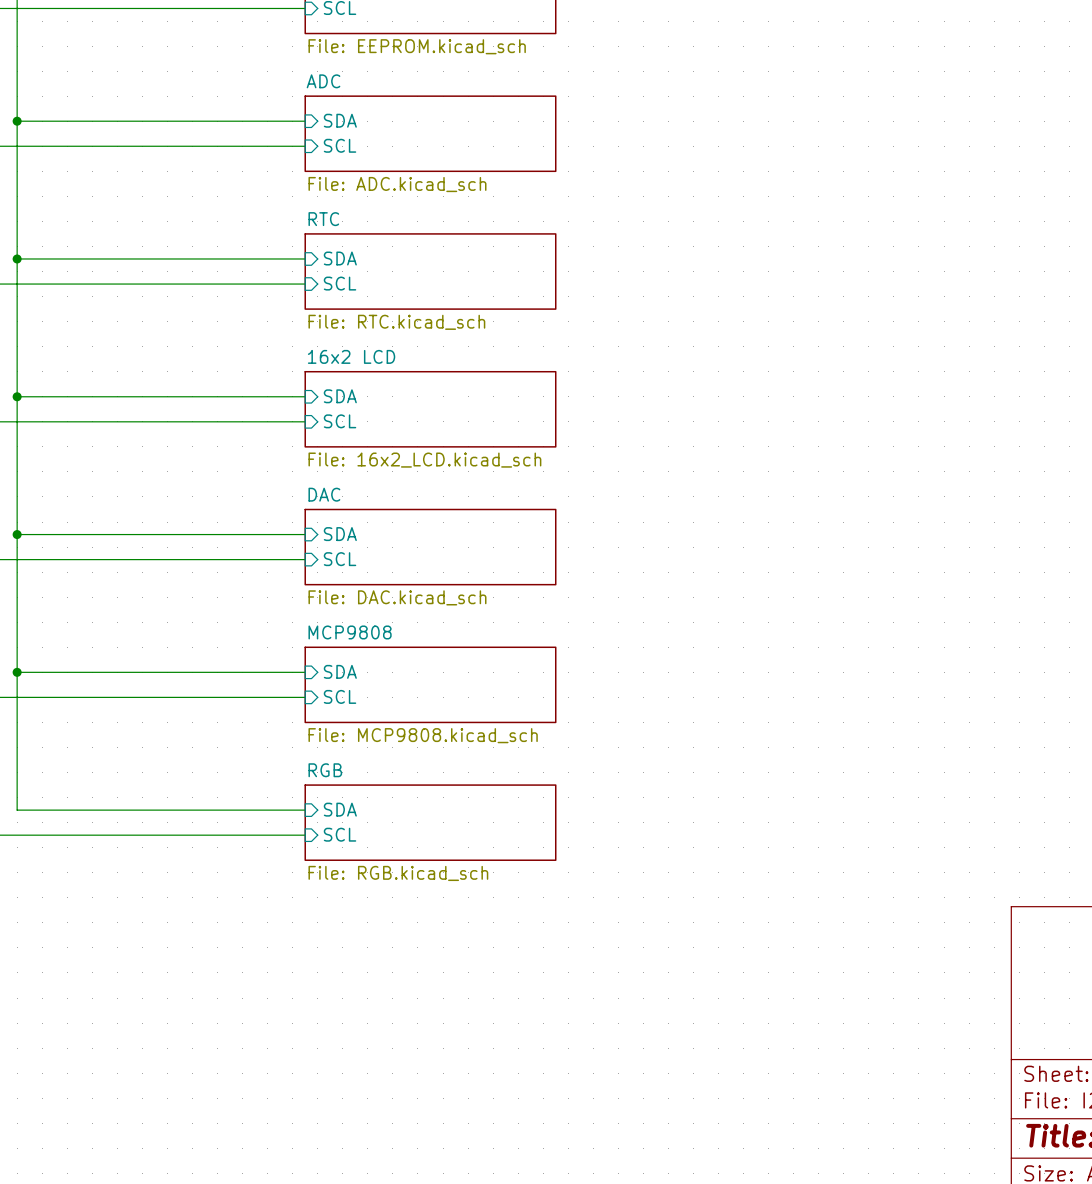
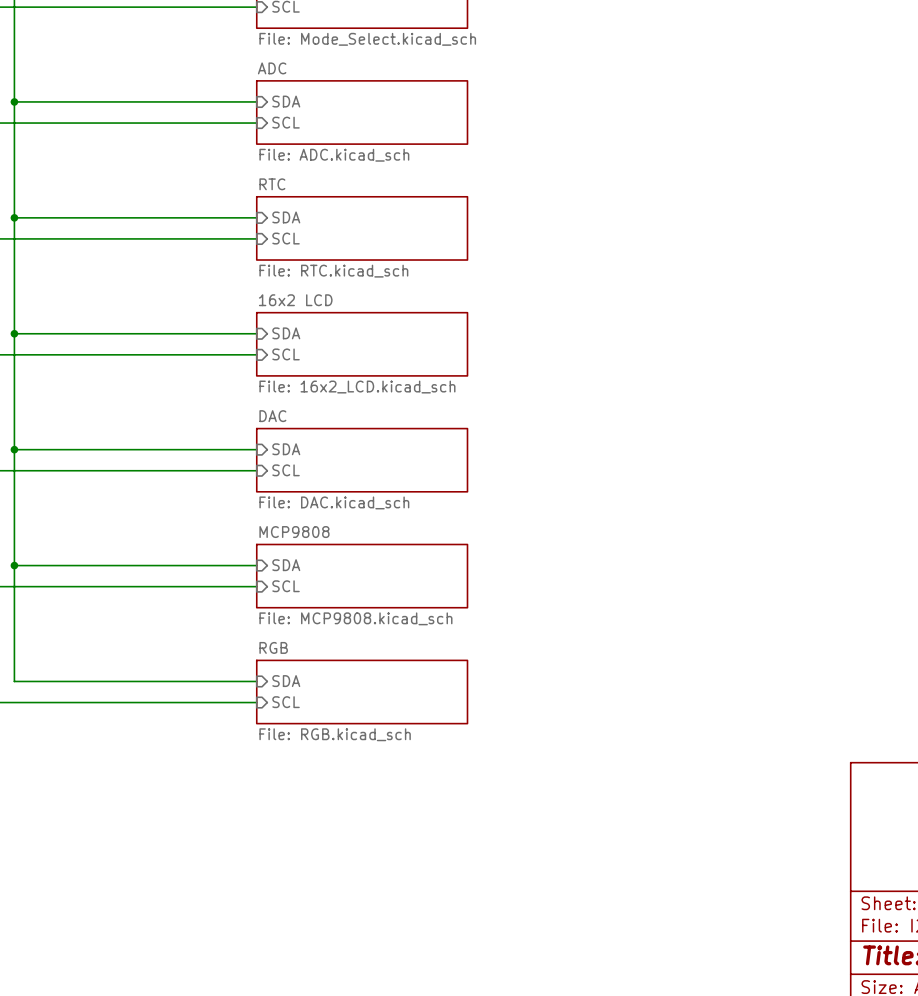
sheet value: File: EEPROM.kicad_sch (417, 46) -> File: Mode_Select.kicad_sch (367, 39)

